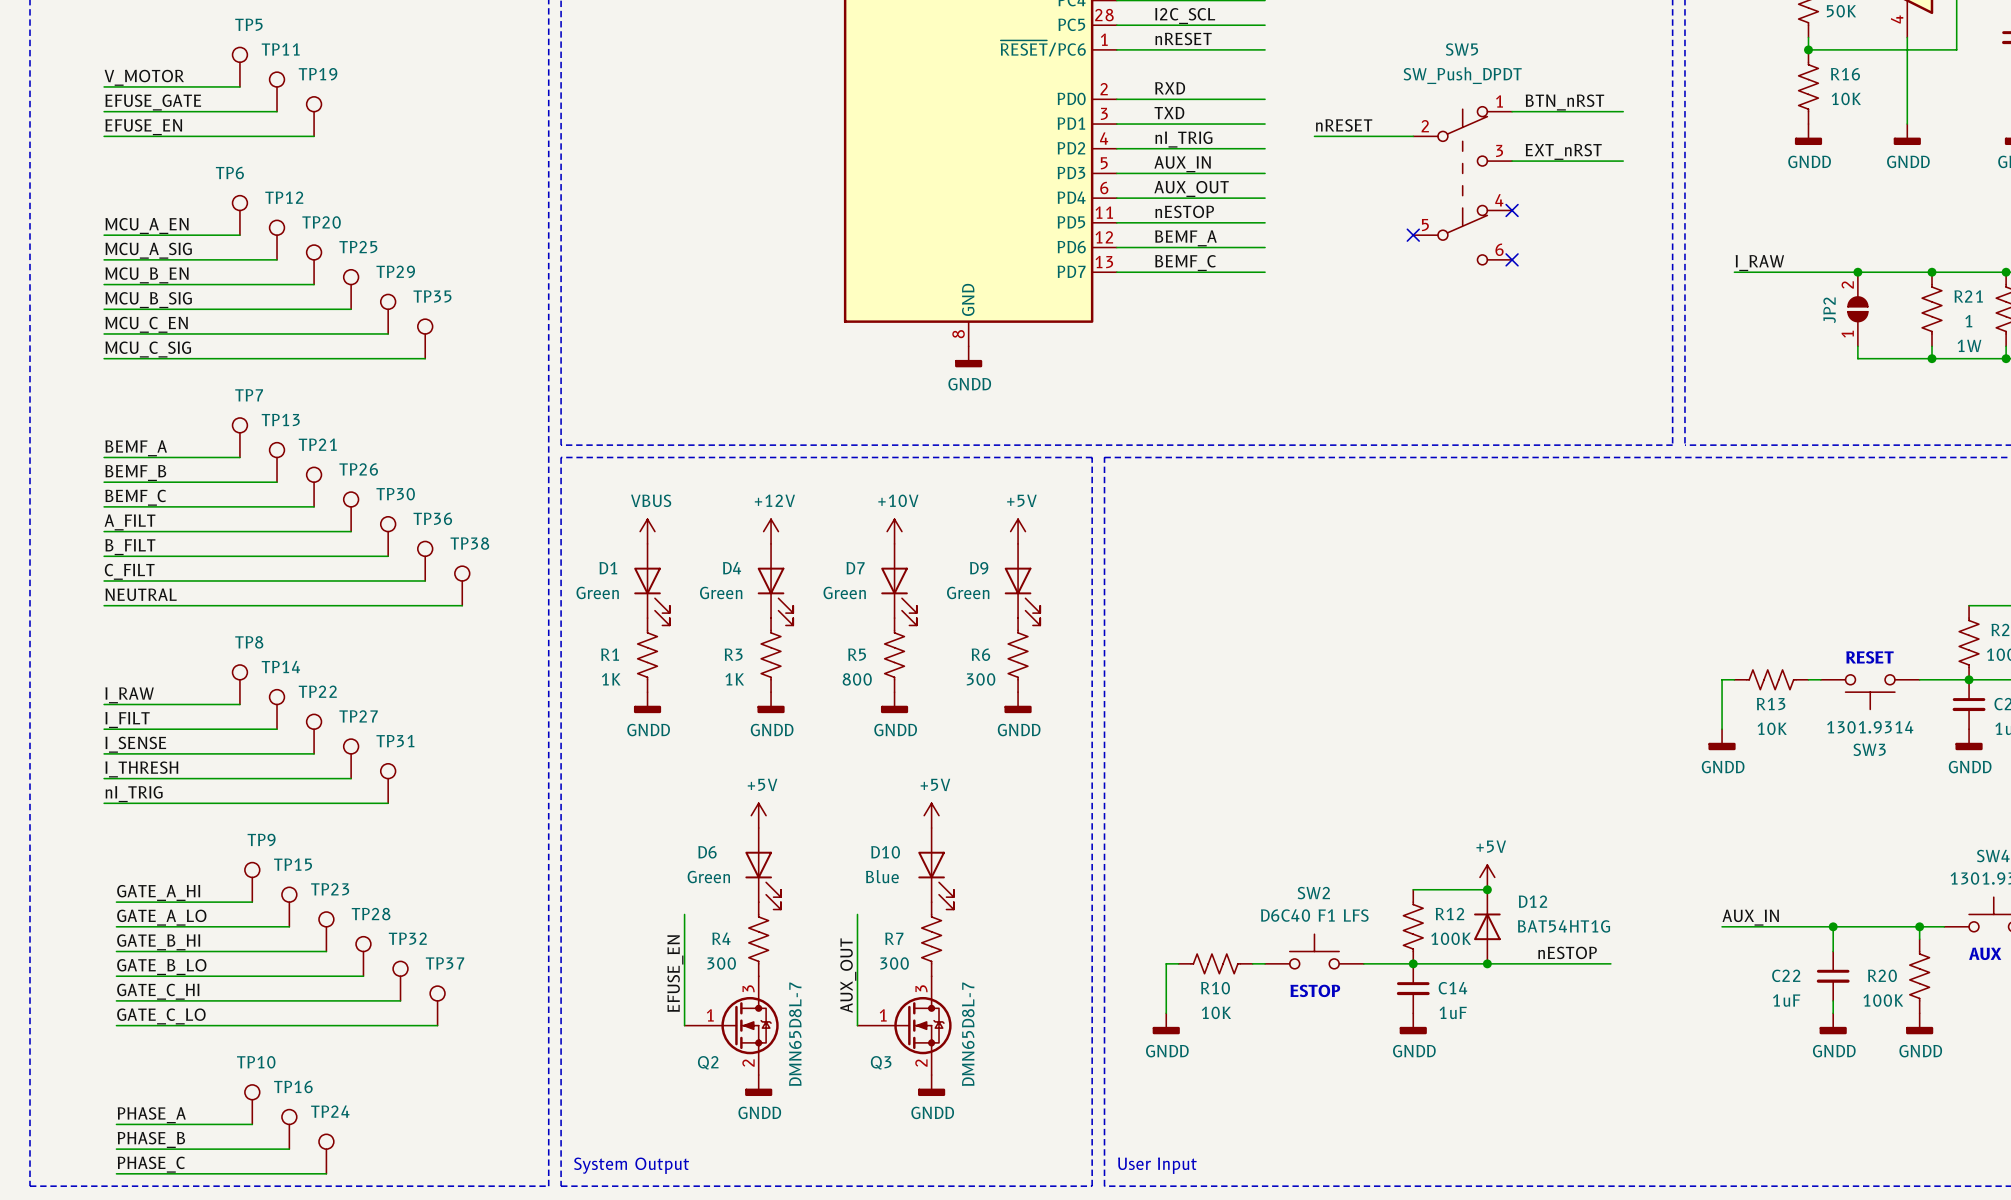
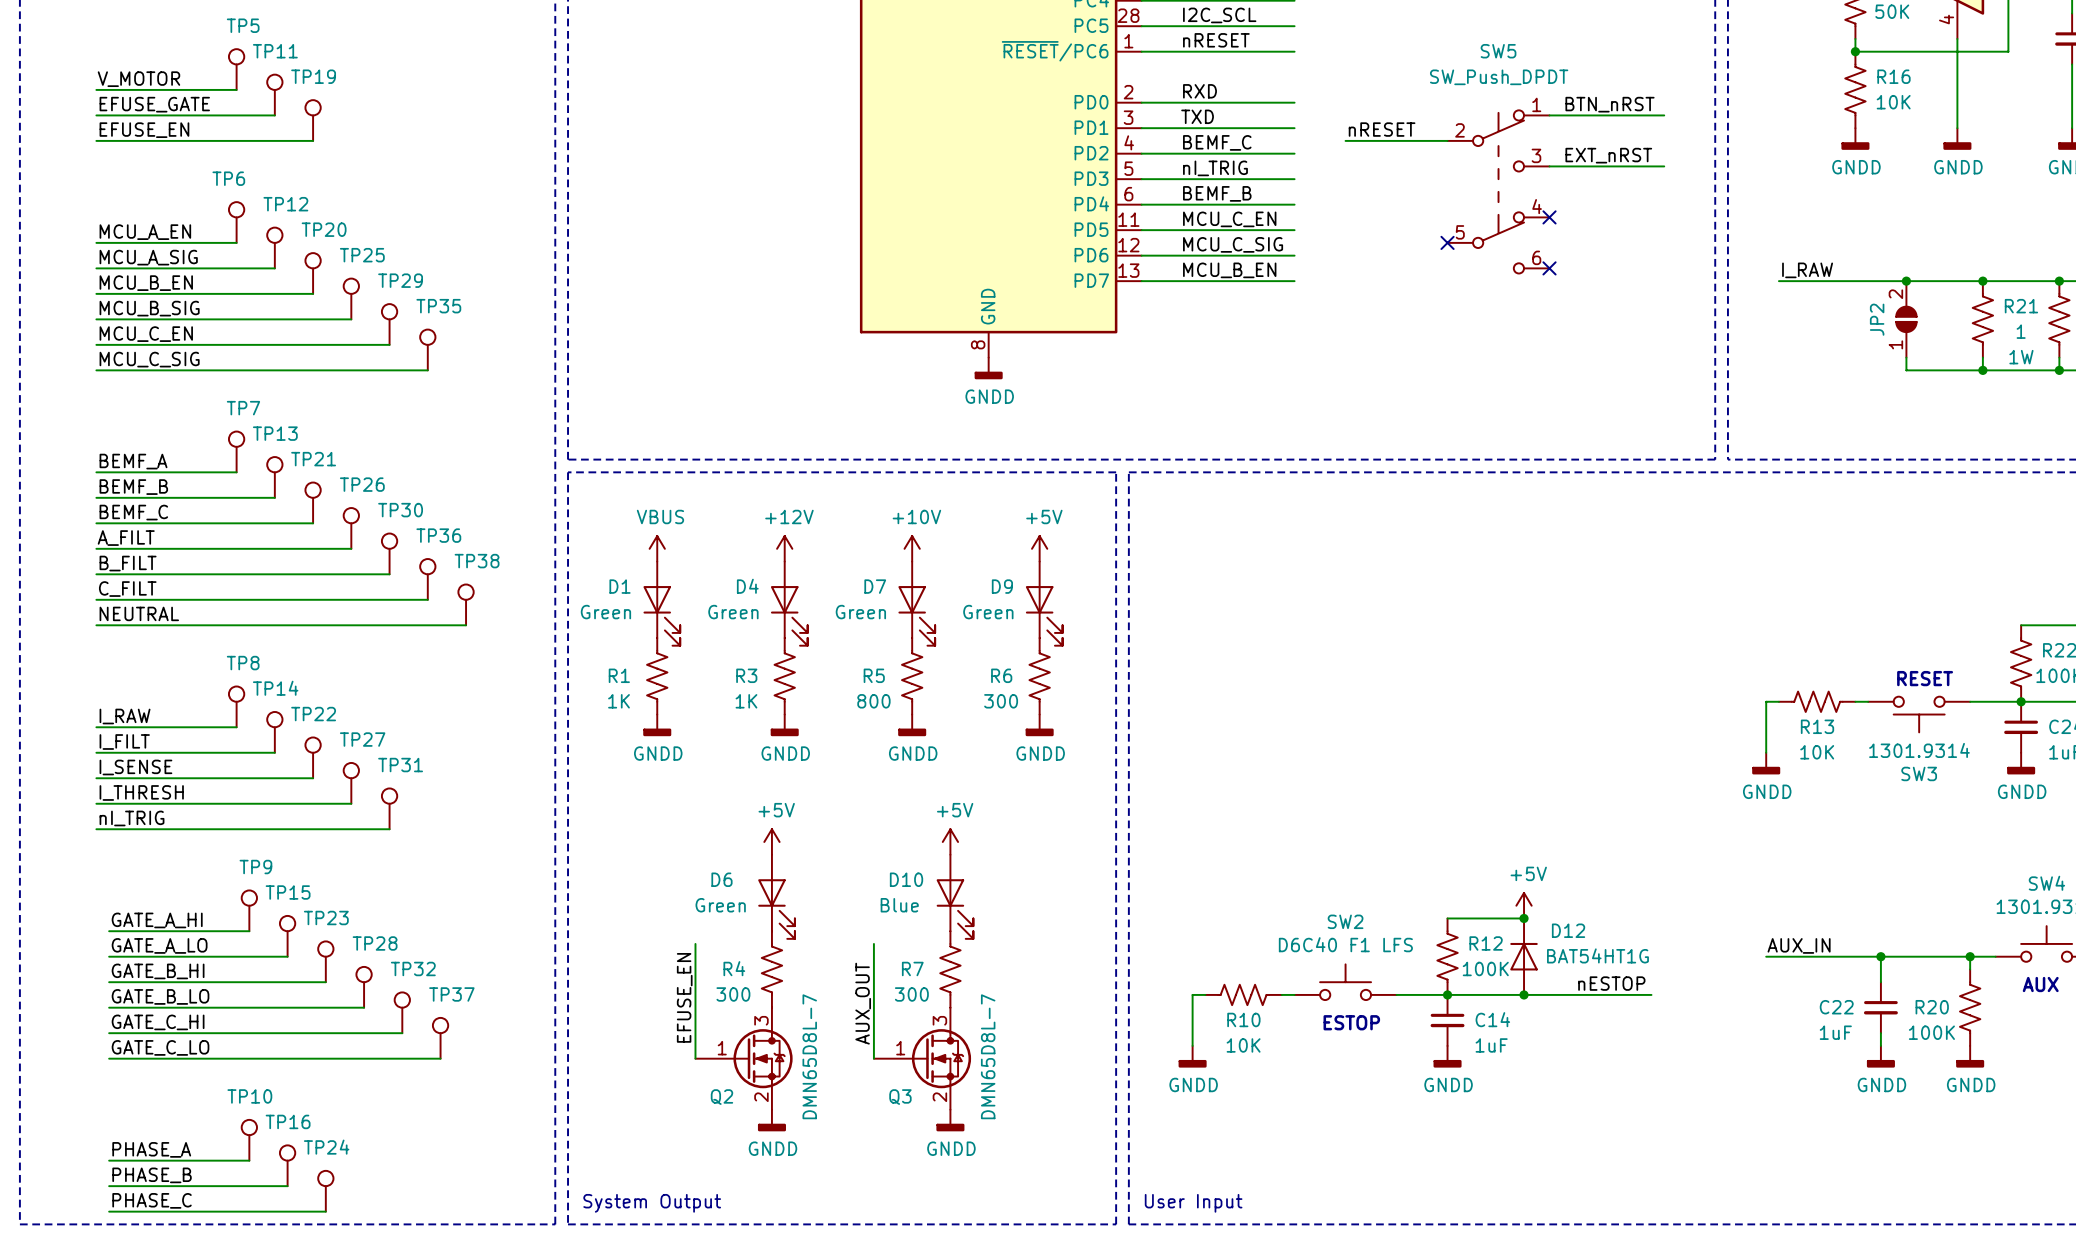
label: nI_TRIG (1183, 139) -> BEMF_C (1217, 142)
label: AUX_IN (1182, 164) -> nI_TRIG (1215, 168)
label: AUX_OUT (1191, 188) -> BEMF_B (1217, 193)
label: nESTOP (1184, 211) -> MCU_C_EN (1229, 219)
label: BEMF_A (1185, 238) -> MCU_C_SIG (1233, 244)
label: BEMF_C (1185, 263) -> MCU_B_EN (1229, 270)

